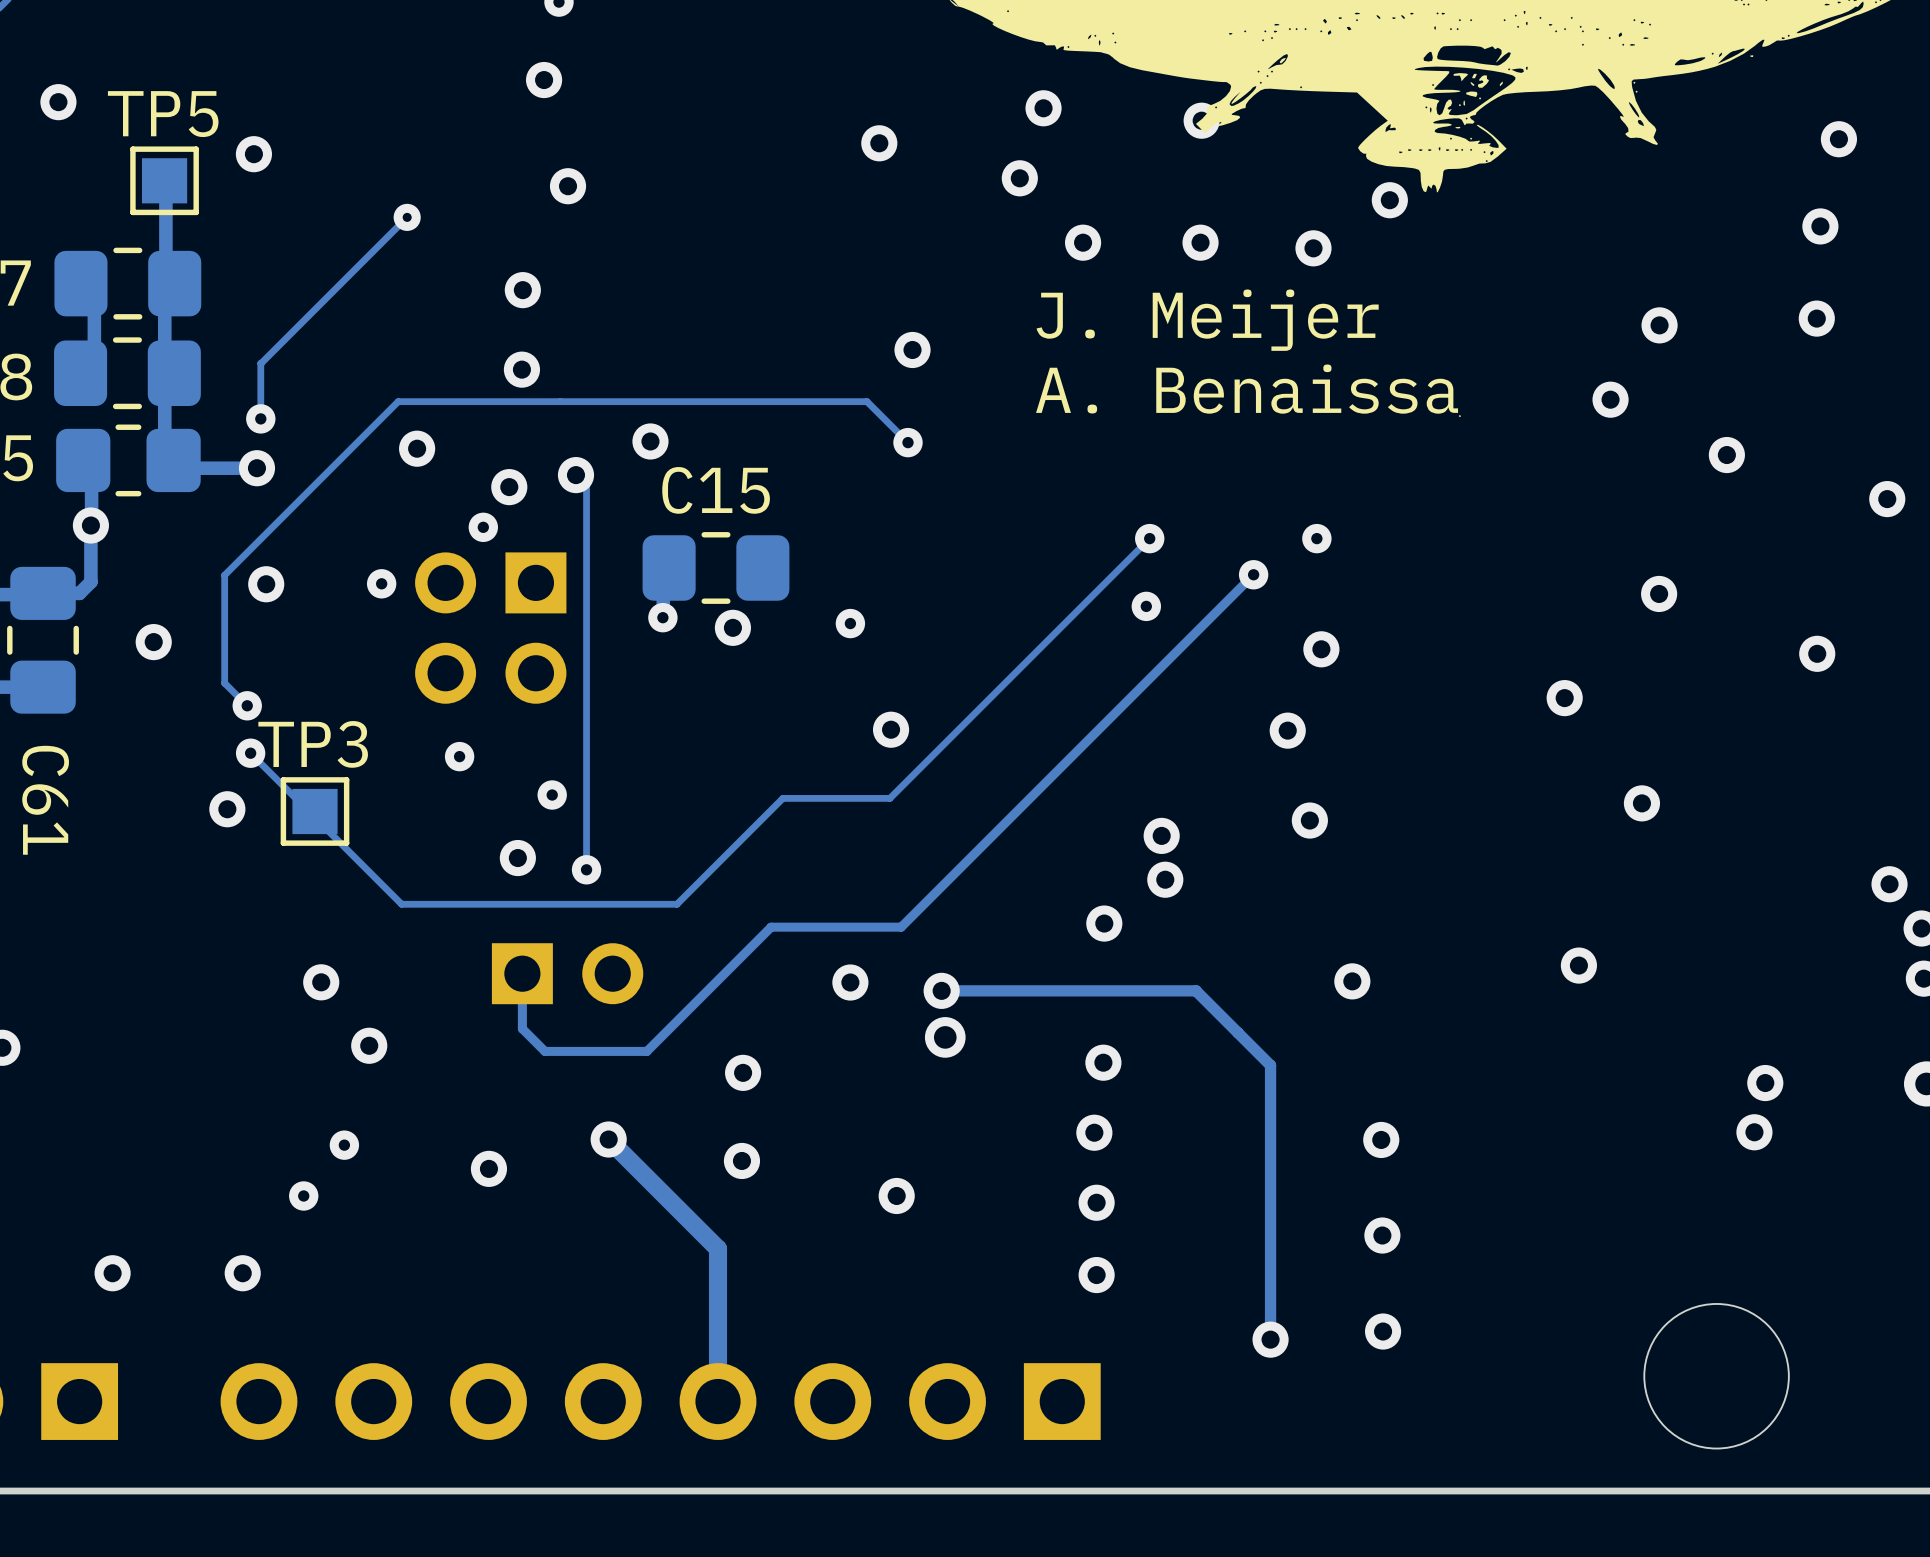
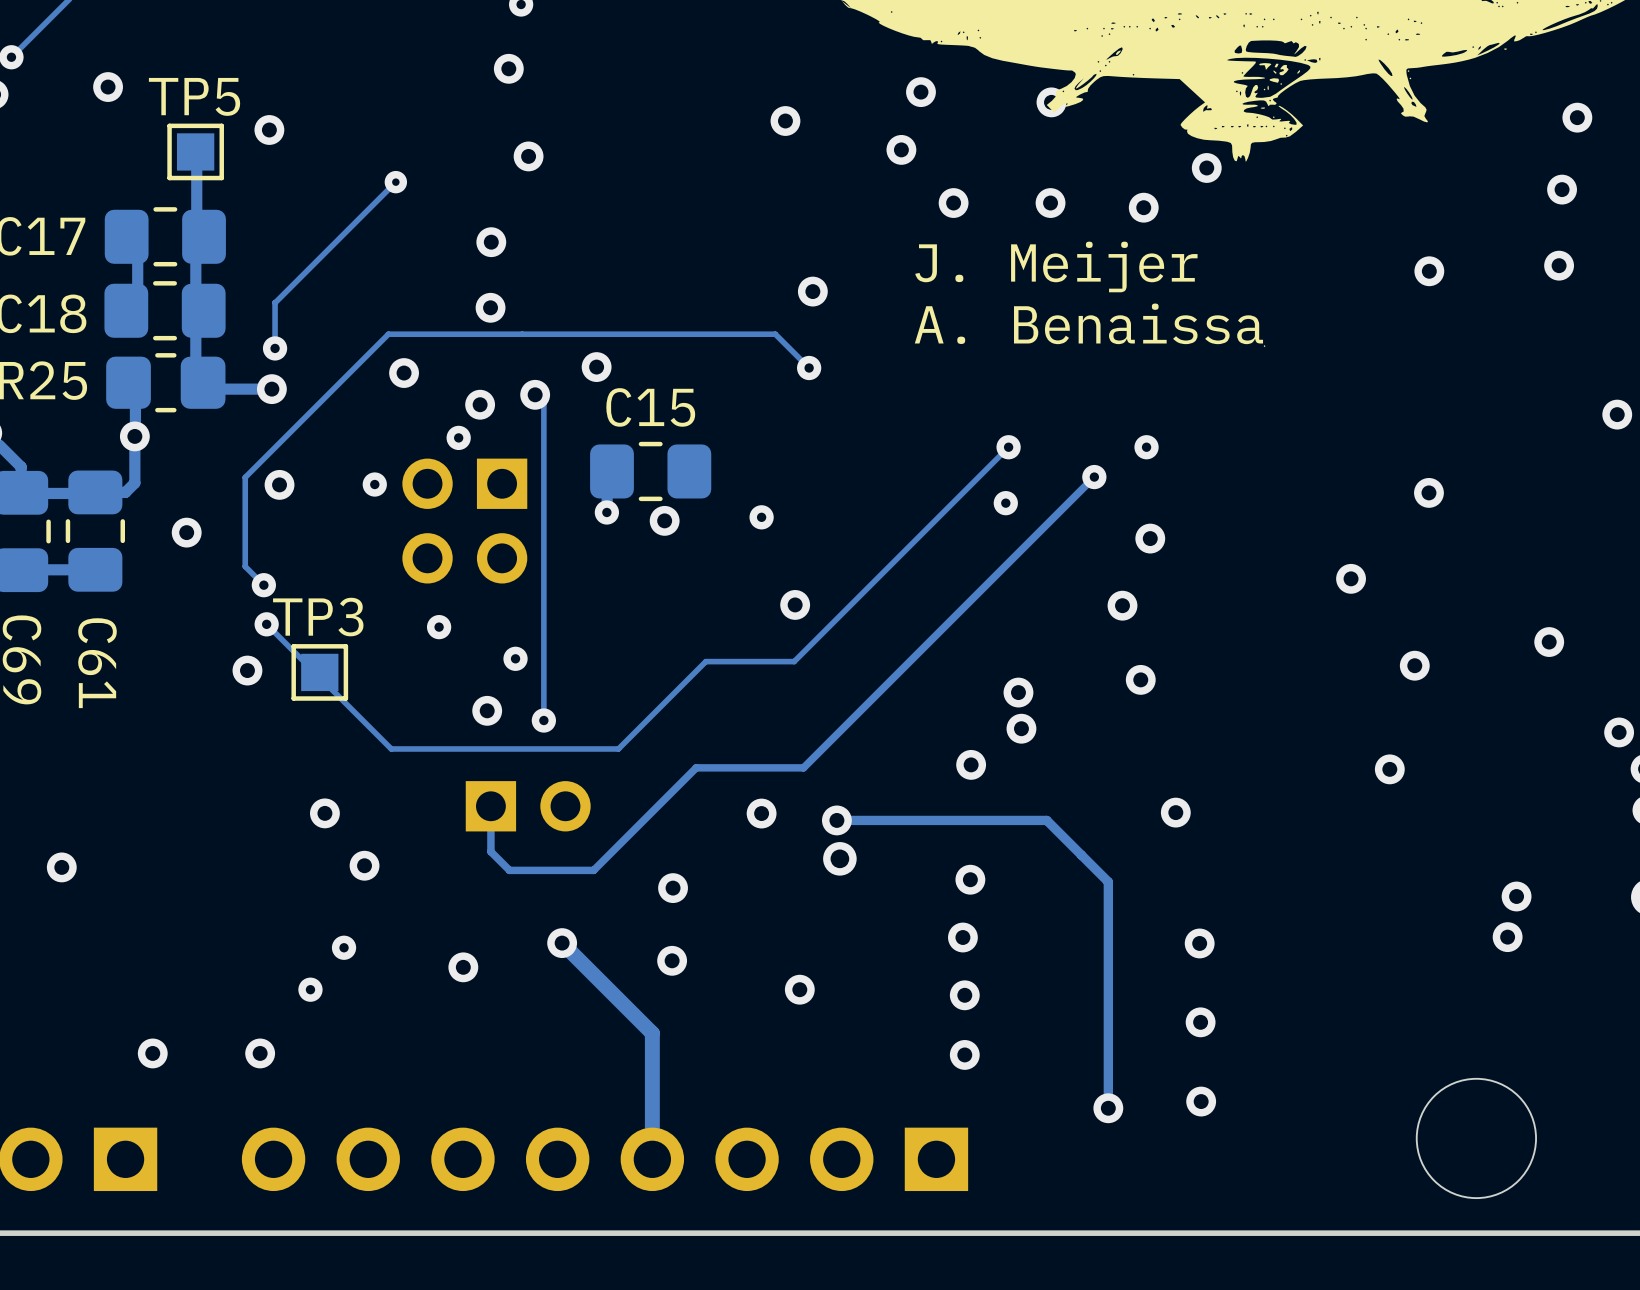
via: (1610, 399) -> none
via: (1726, 455) -> none
via position: (1817, 653) -> (1549, 642)
via position: (1578, 965) -> (1389, 769)

